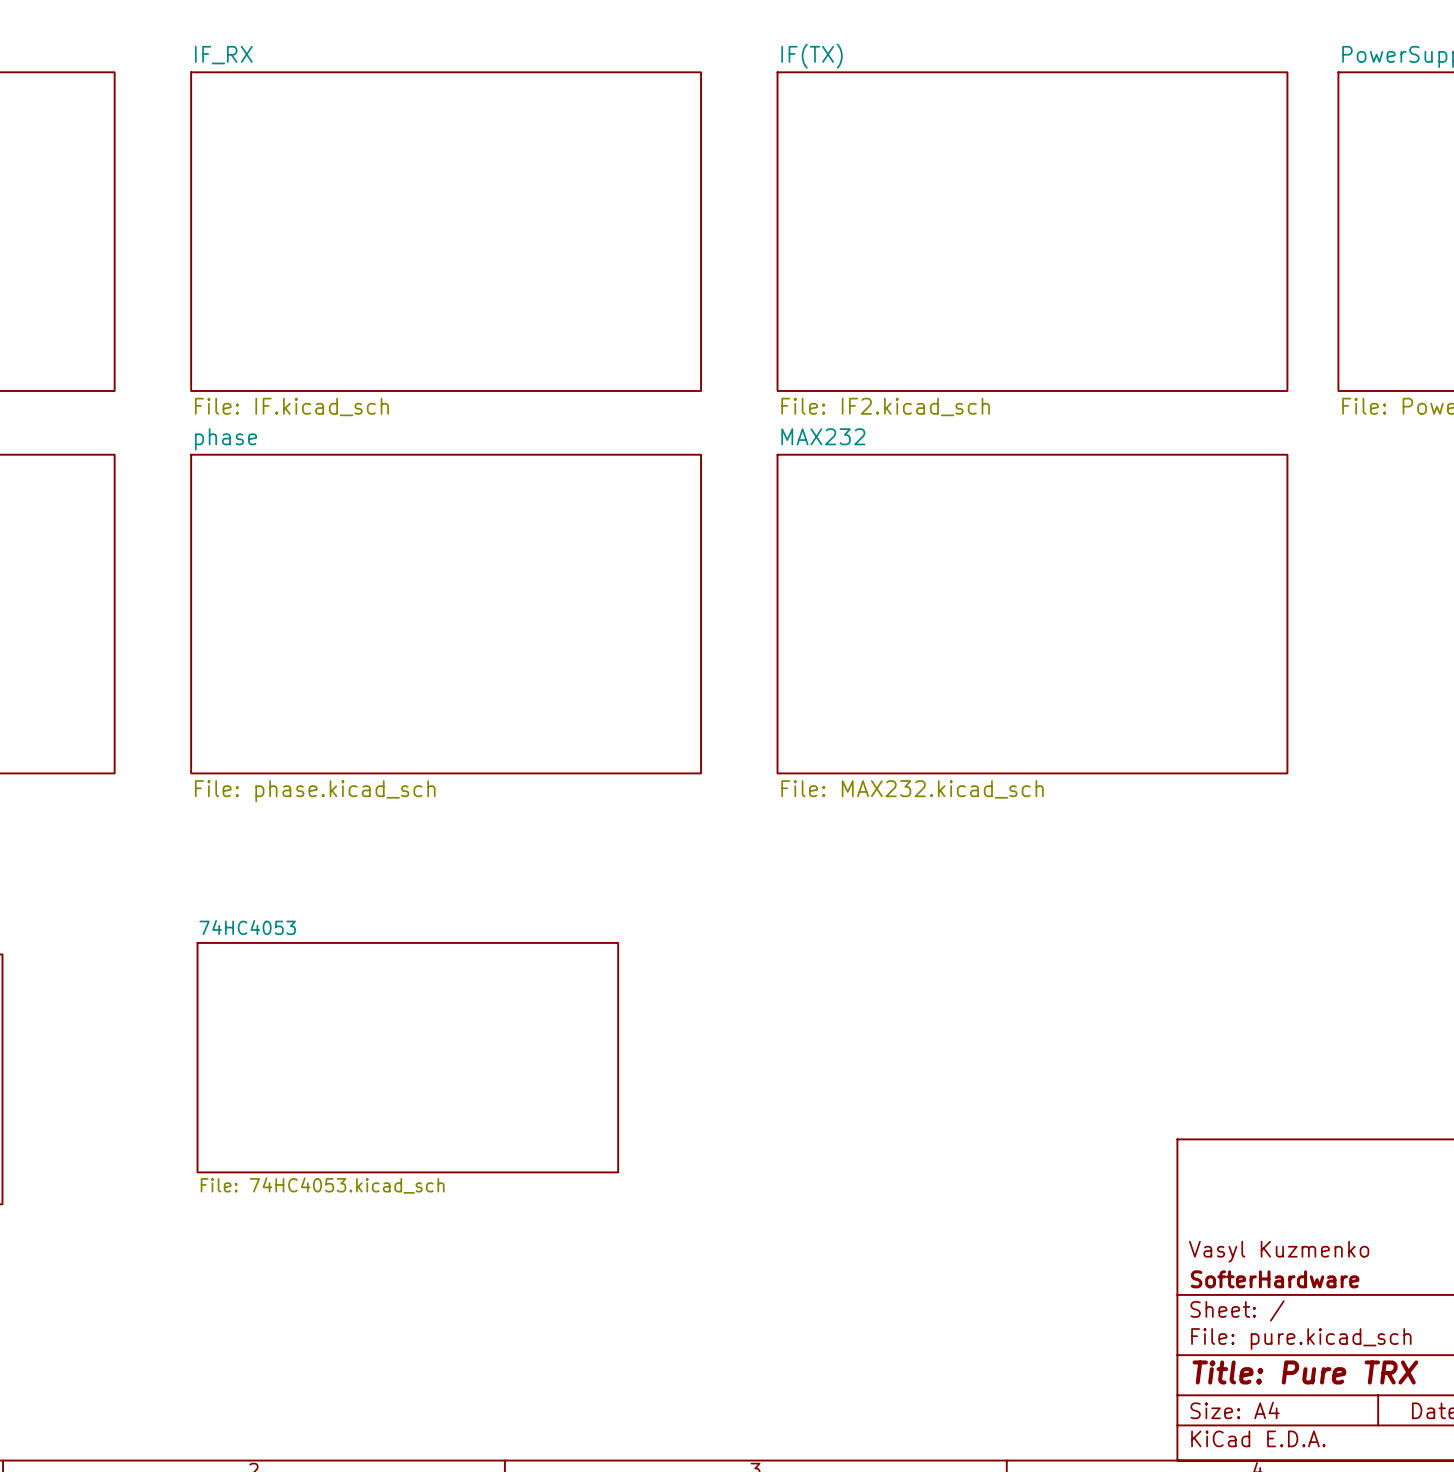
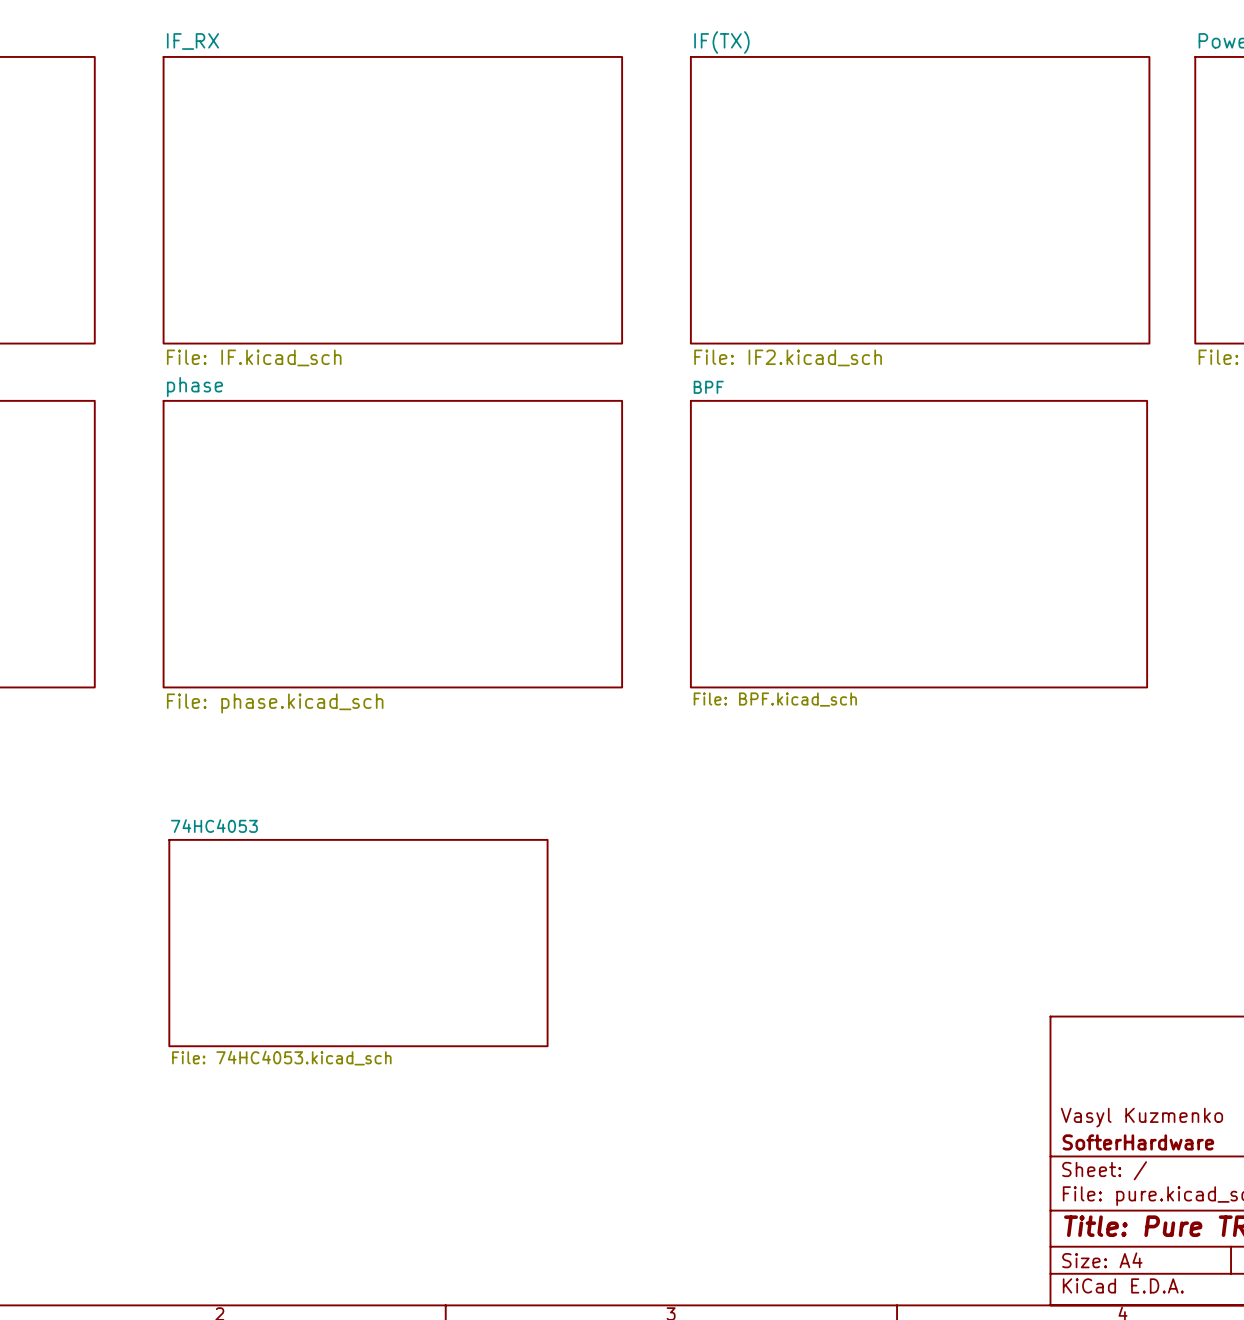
sheet BPF: none -> File: BPF.kicad_sch (919, 544)
sheet MAX232: File: MAX232.kicad_sch (1032, 614) -> none

